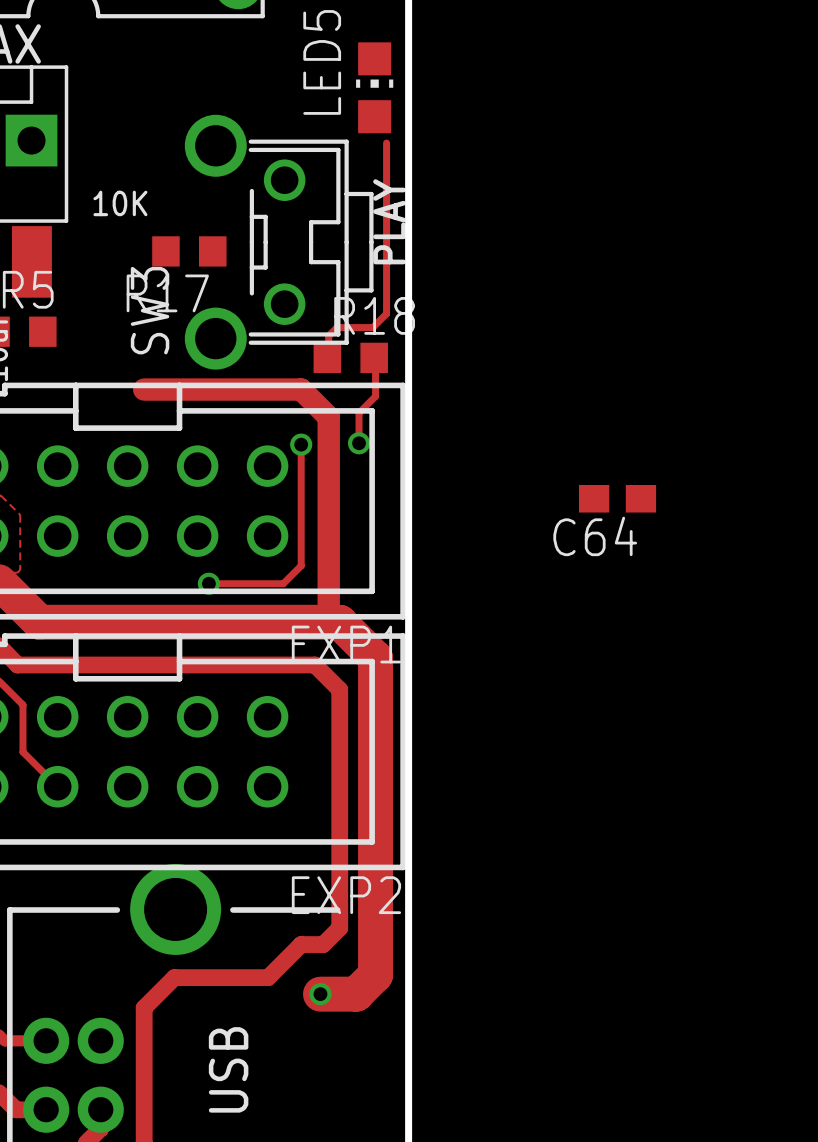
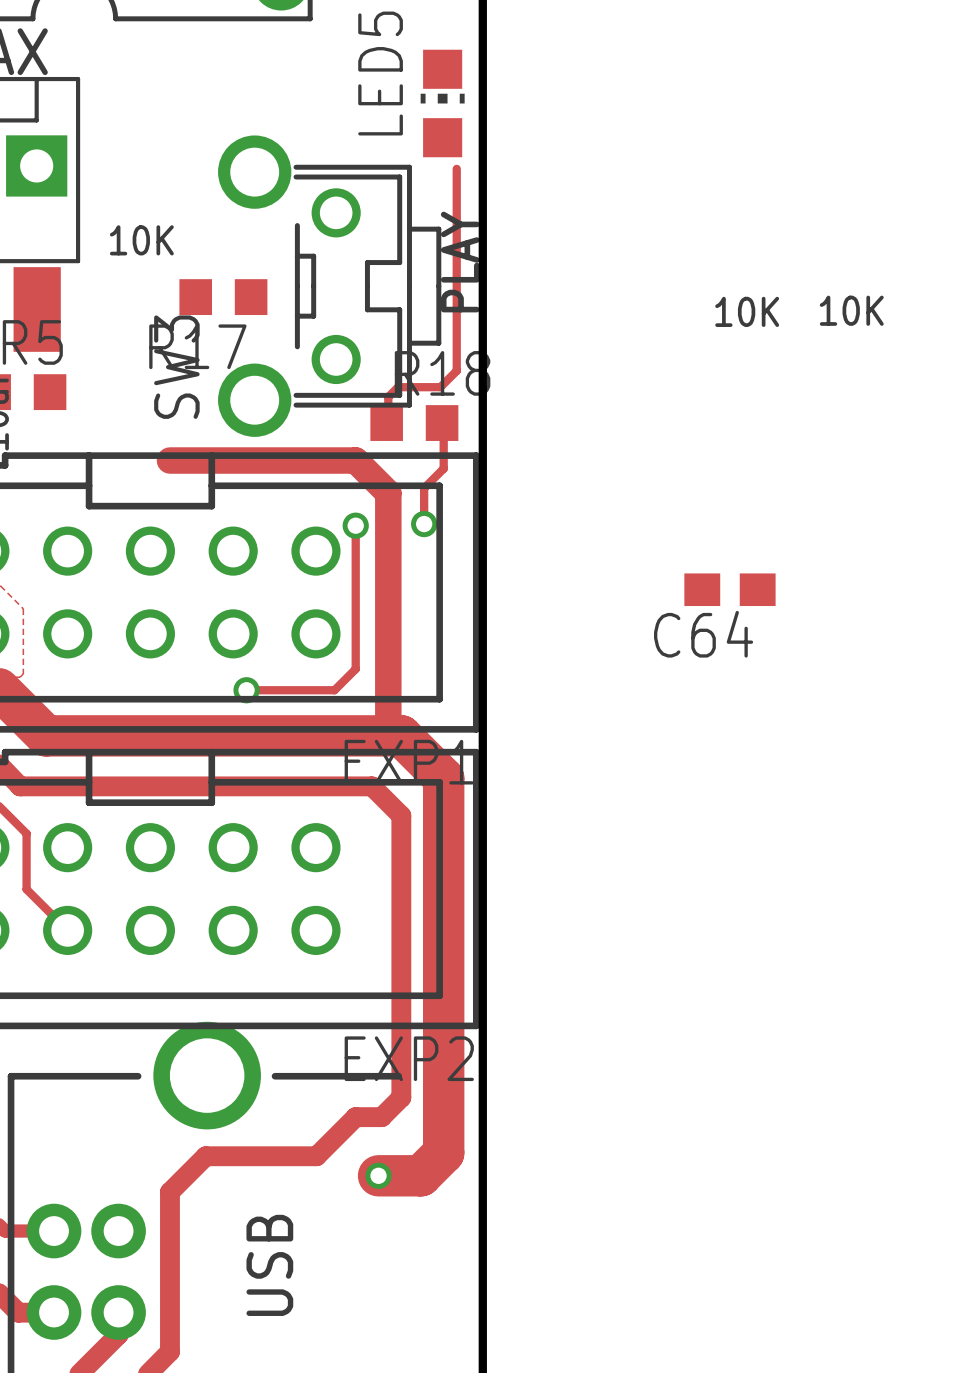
text: none -> 10K (851, 310)
text: none -> 10K (747, 311)

